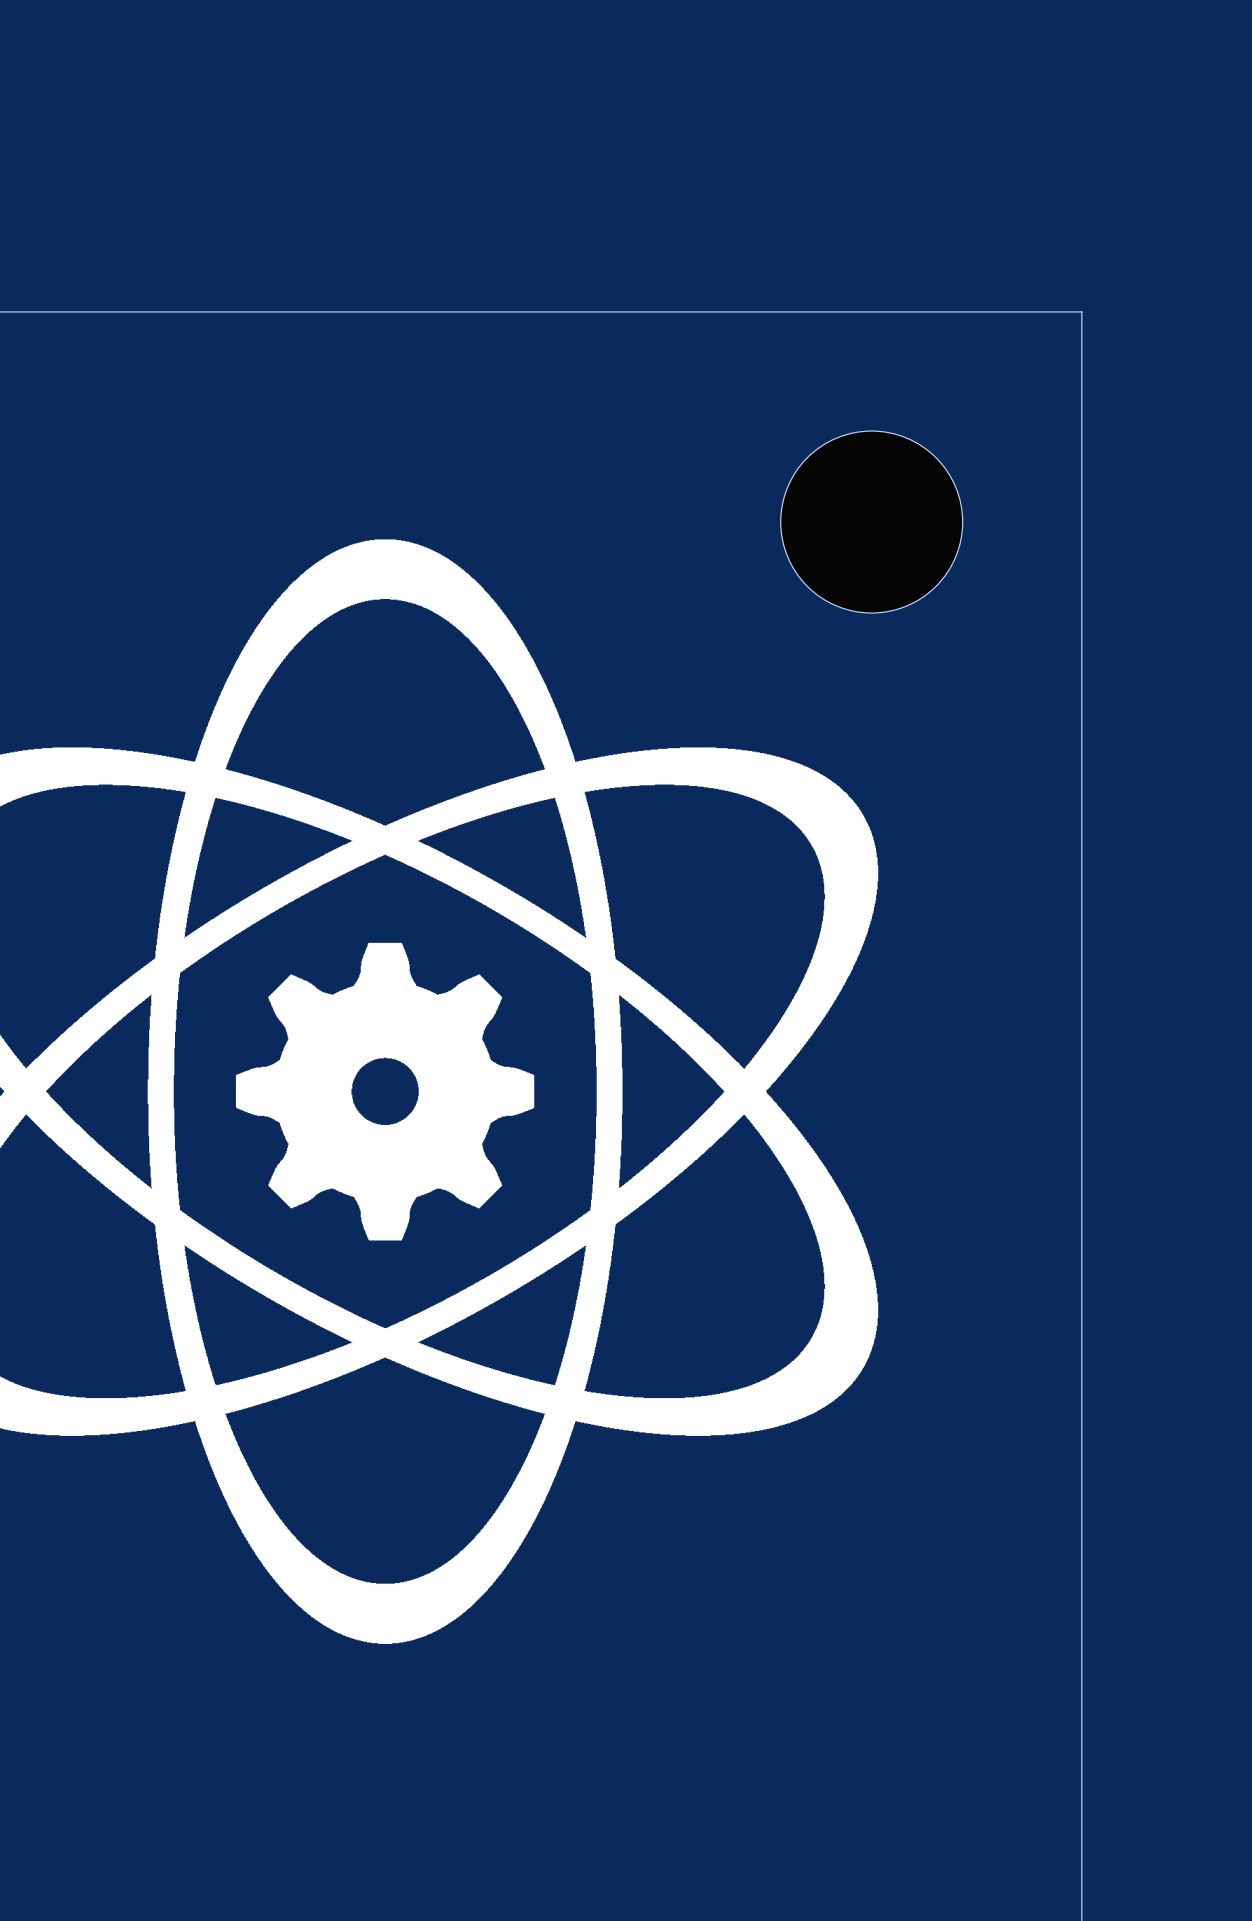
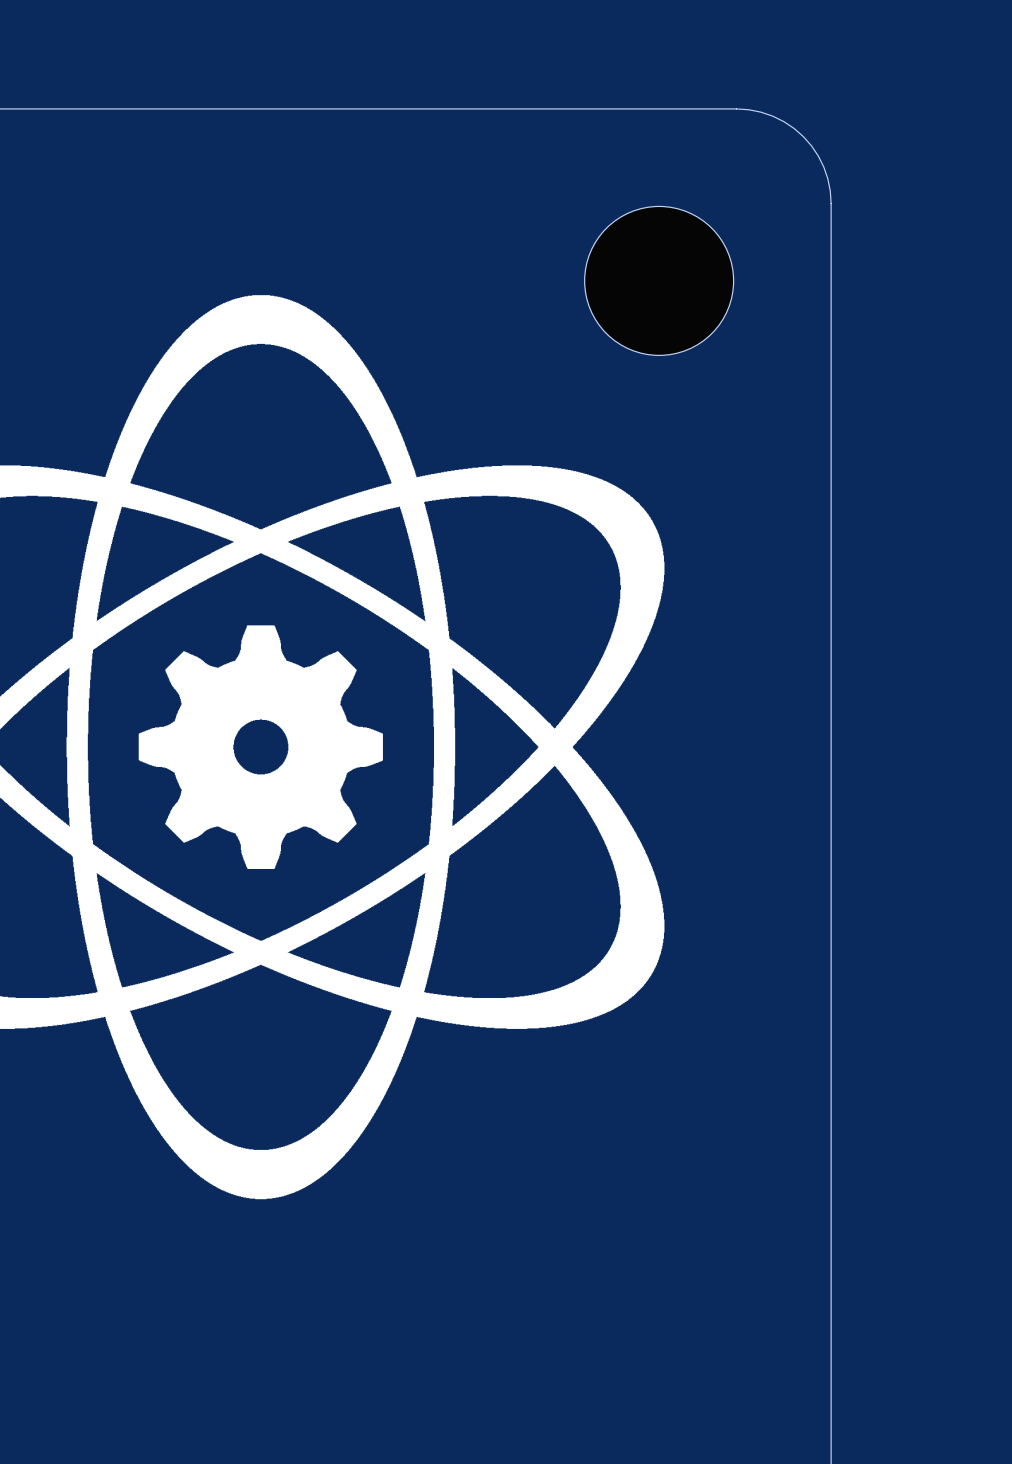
board edge: (966, 311) (1081, 311) (1081, 427) -> (736, 108) (761, 112) (772, 116) (794, 128) (803, 136) (811, 145) (823, 167) (827, 179) (831, 203)

